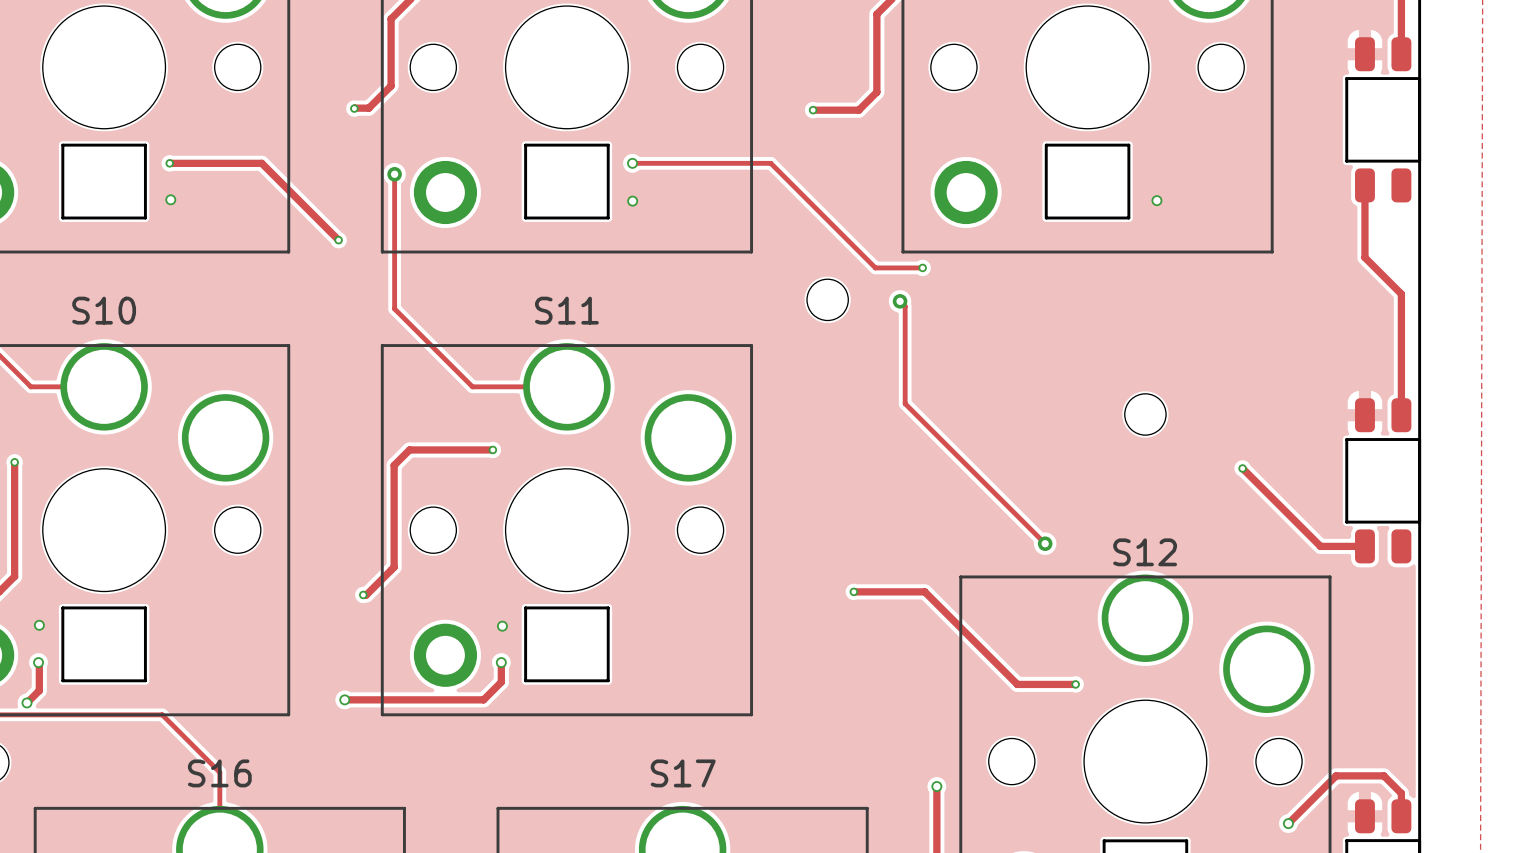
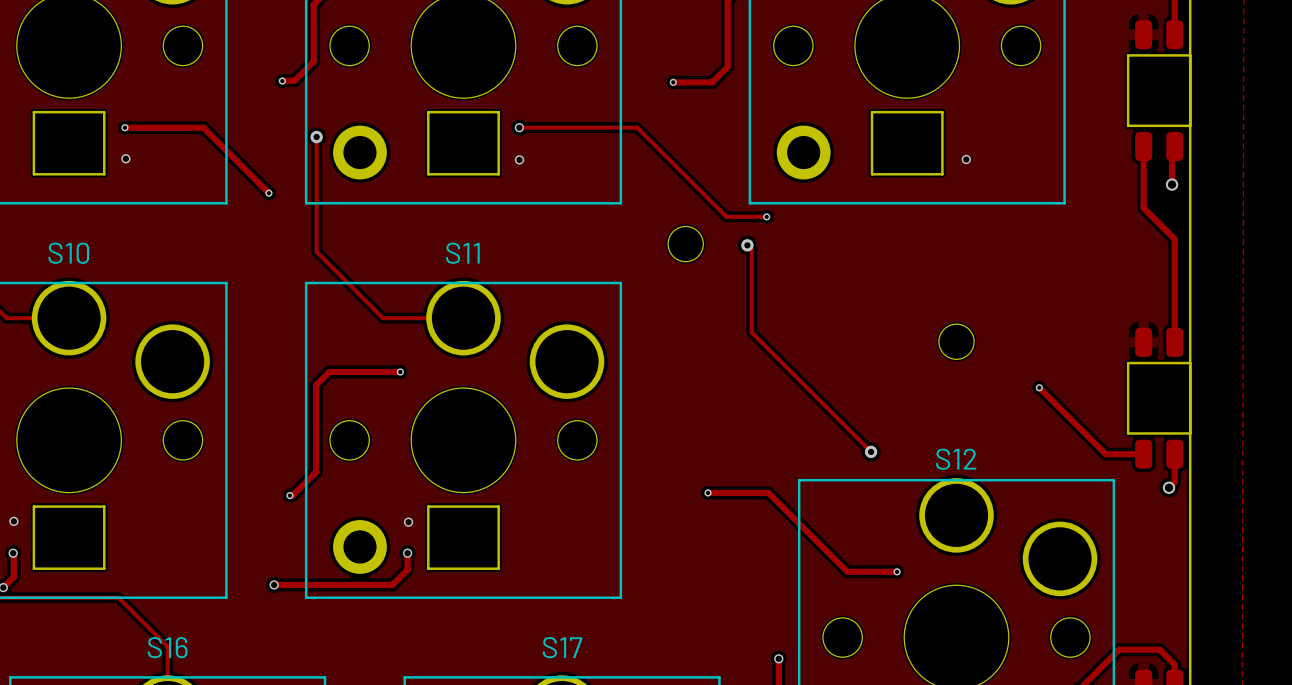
track: none -> (1174, 146) (1172, 149) (1172, 184)
via: none -> (1172, 184)
track: none -> (1174, 454) (1174, 482) (1169, 487)
via: none -> (1169, 487)

